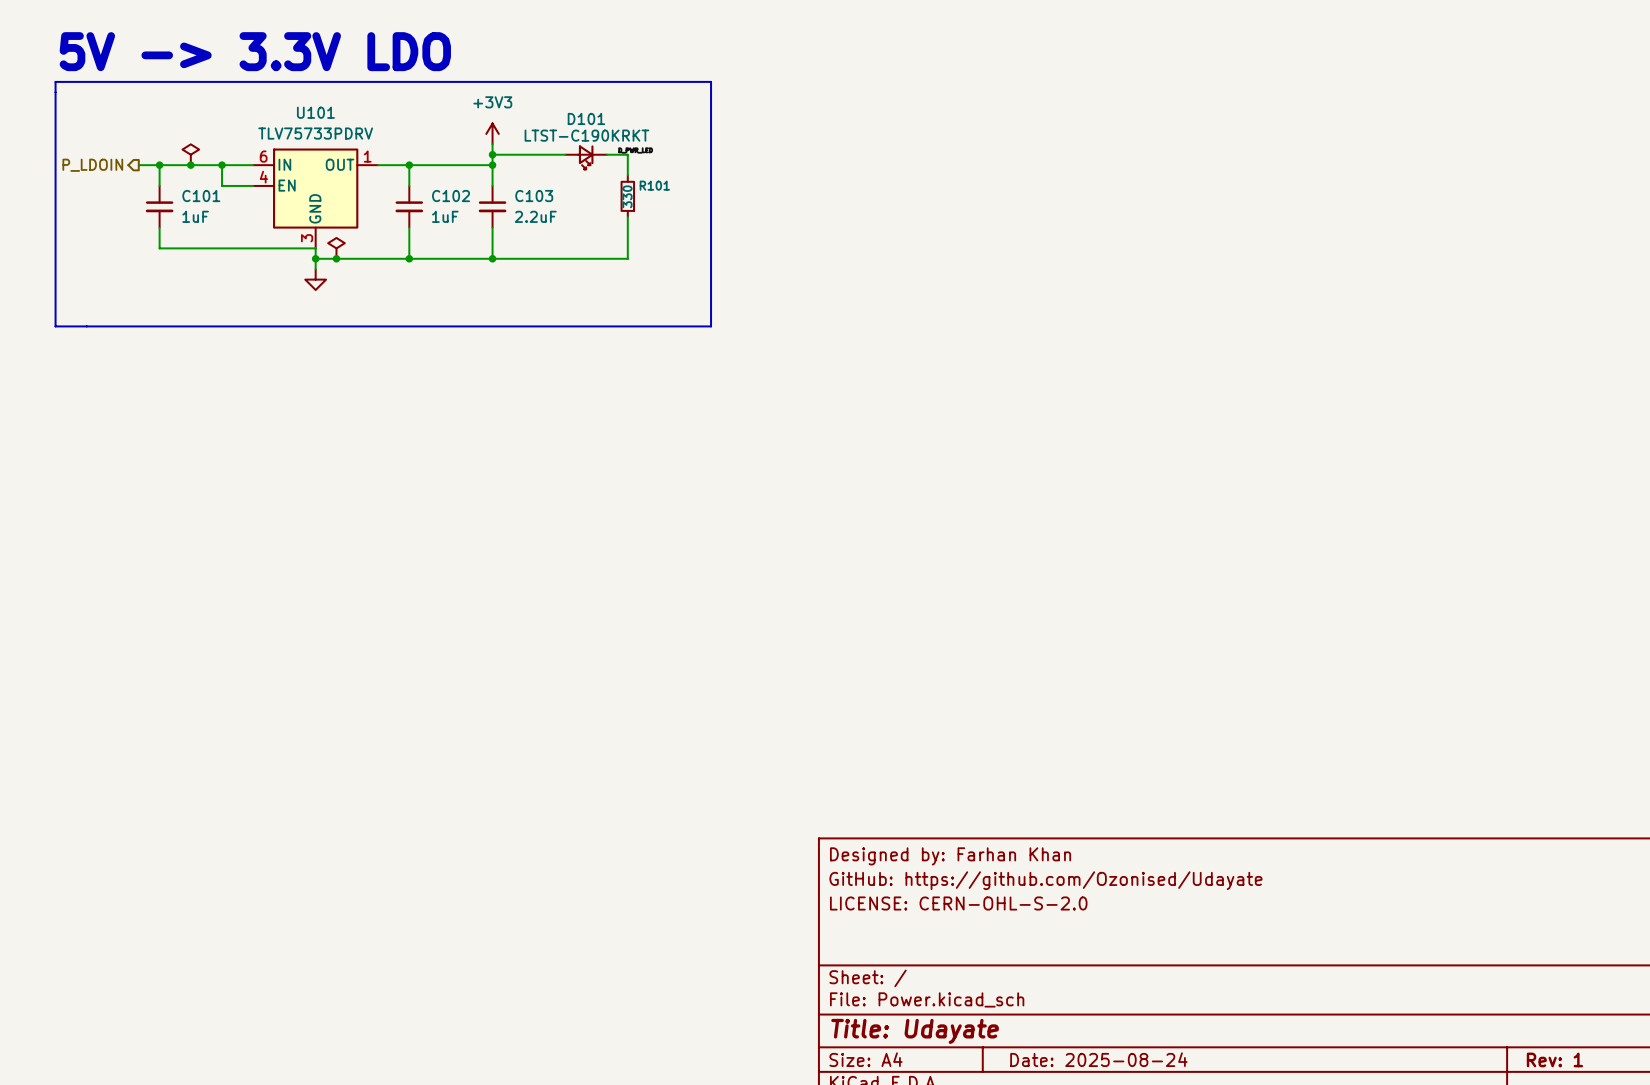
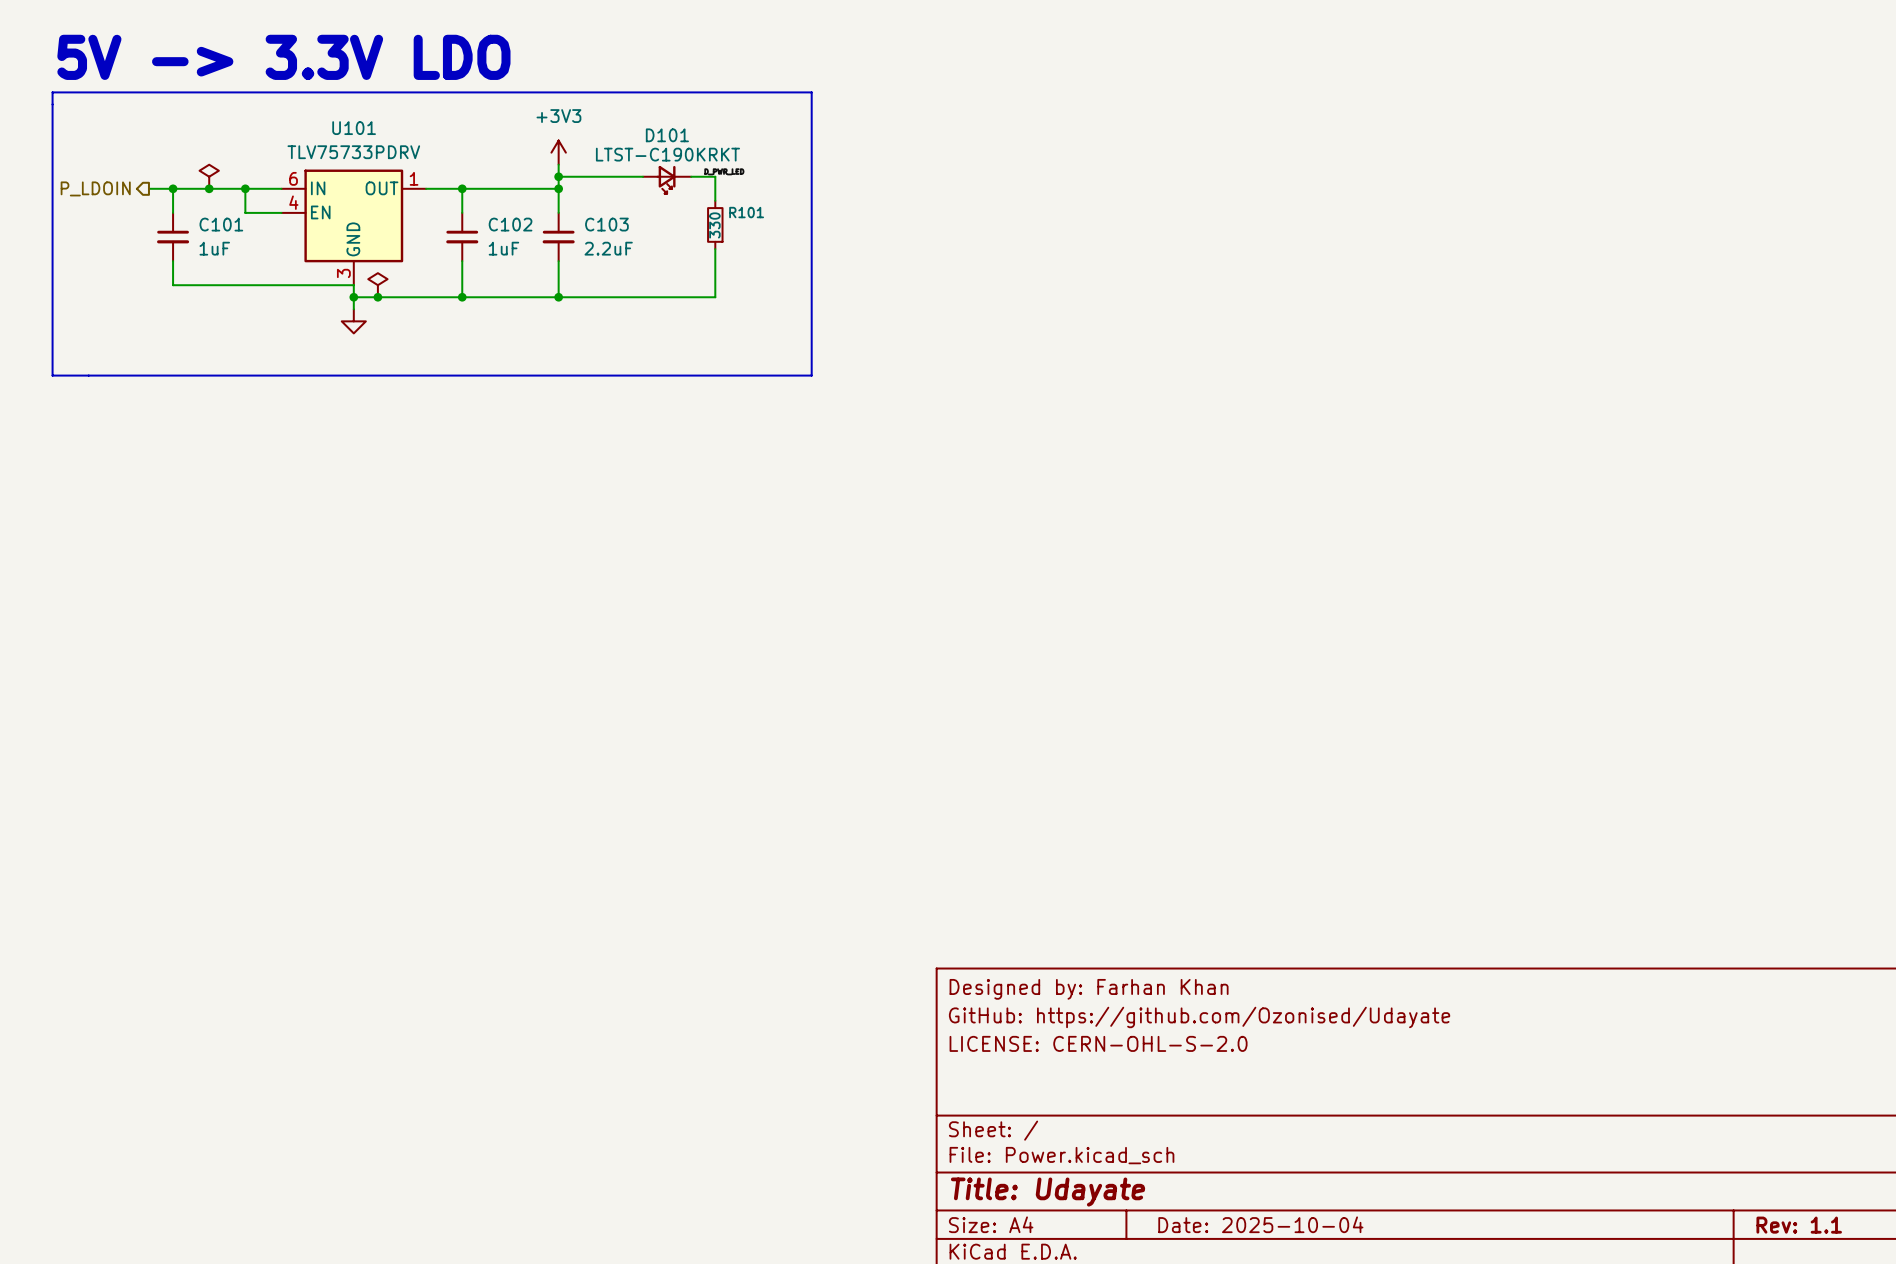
title block: Date: 2025-08-24 (1098, 1059) -> Date: 2025-10-04 (1260, 1224)
title block: Rev: 1 (1554, 1059) -> Rev: 1.1 (1799, 1225)

